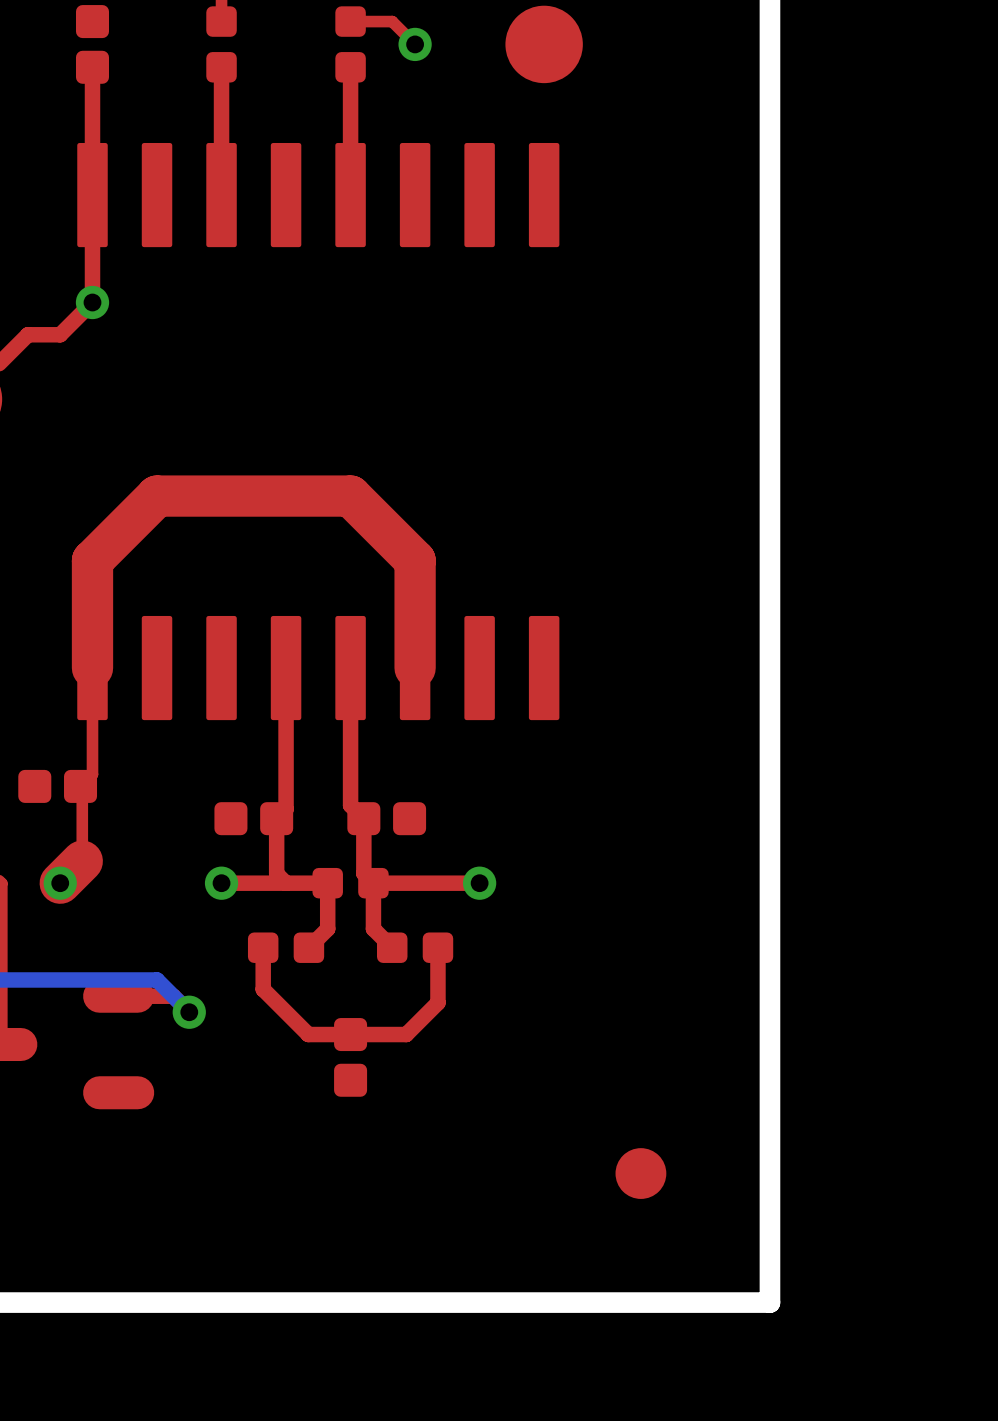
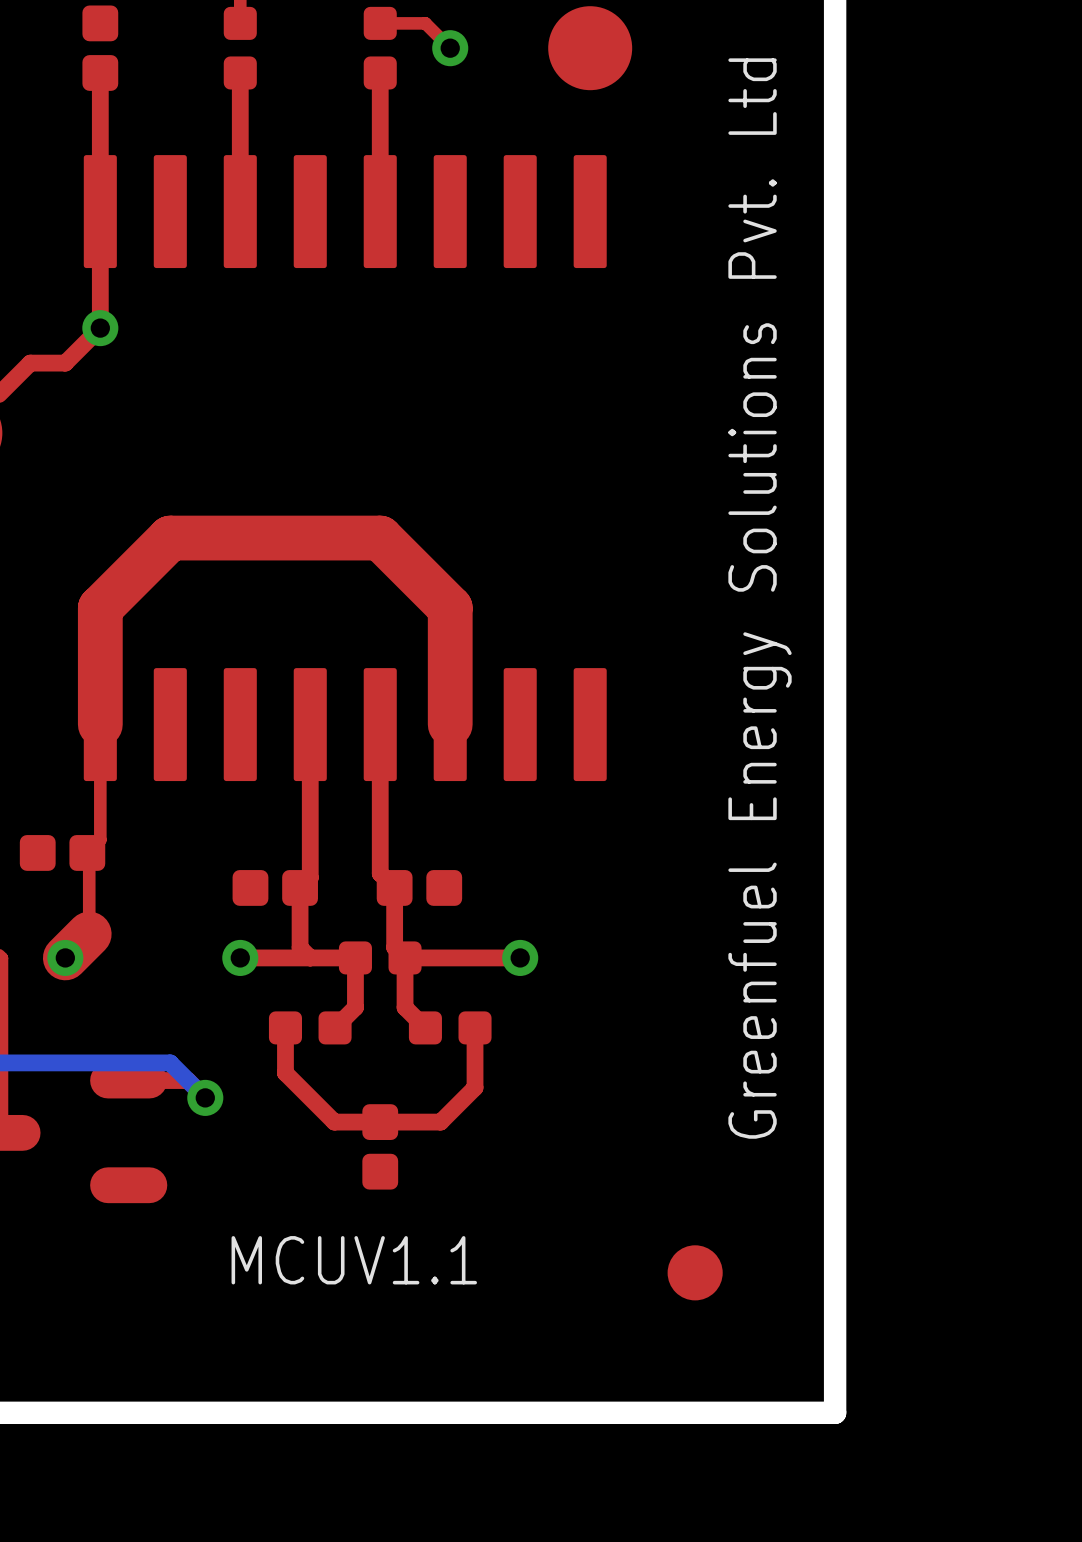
text: none -> Greenfuel Energy Solutions Pvt. Ltd (760, 598)
text: none -> MCUV1.1 (354, 1260)

